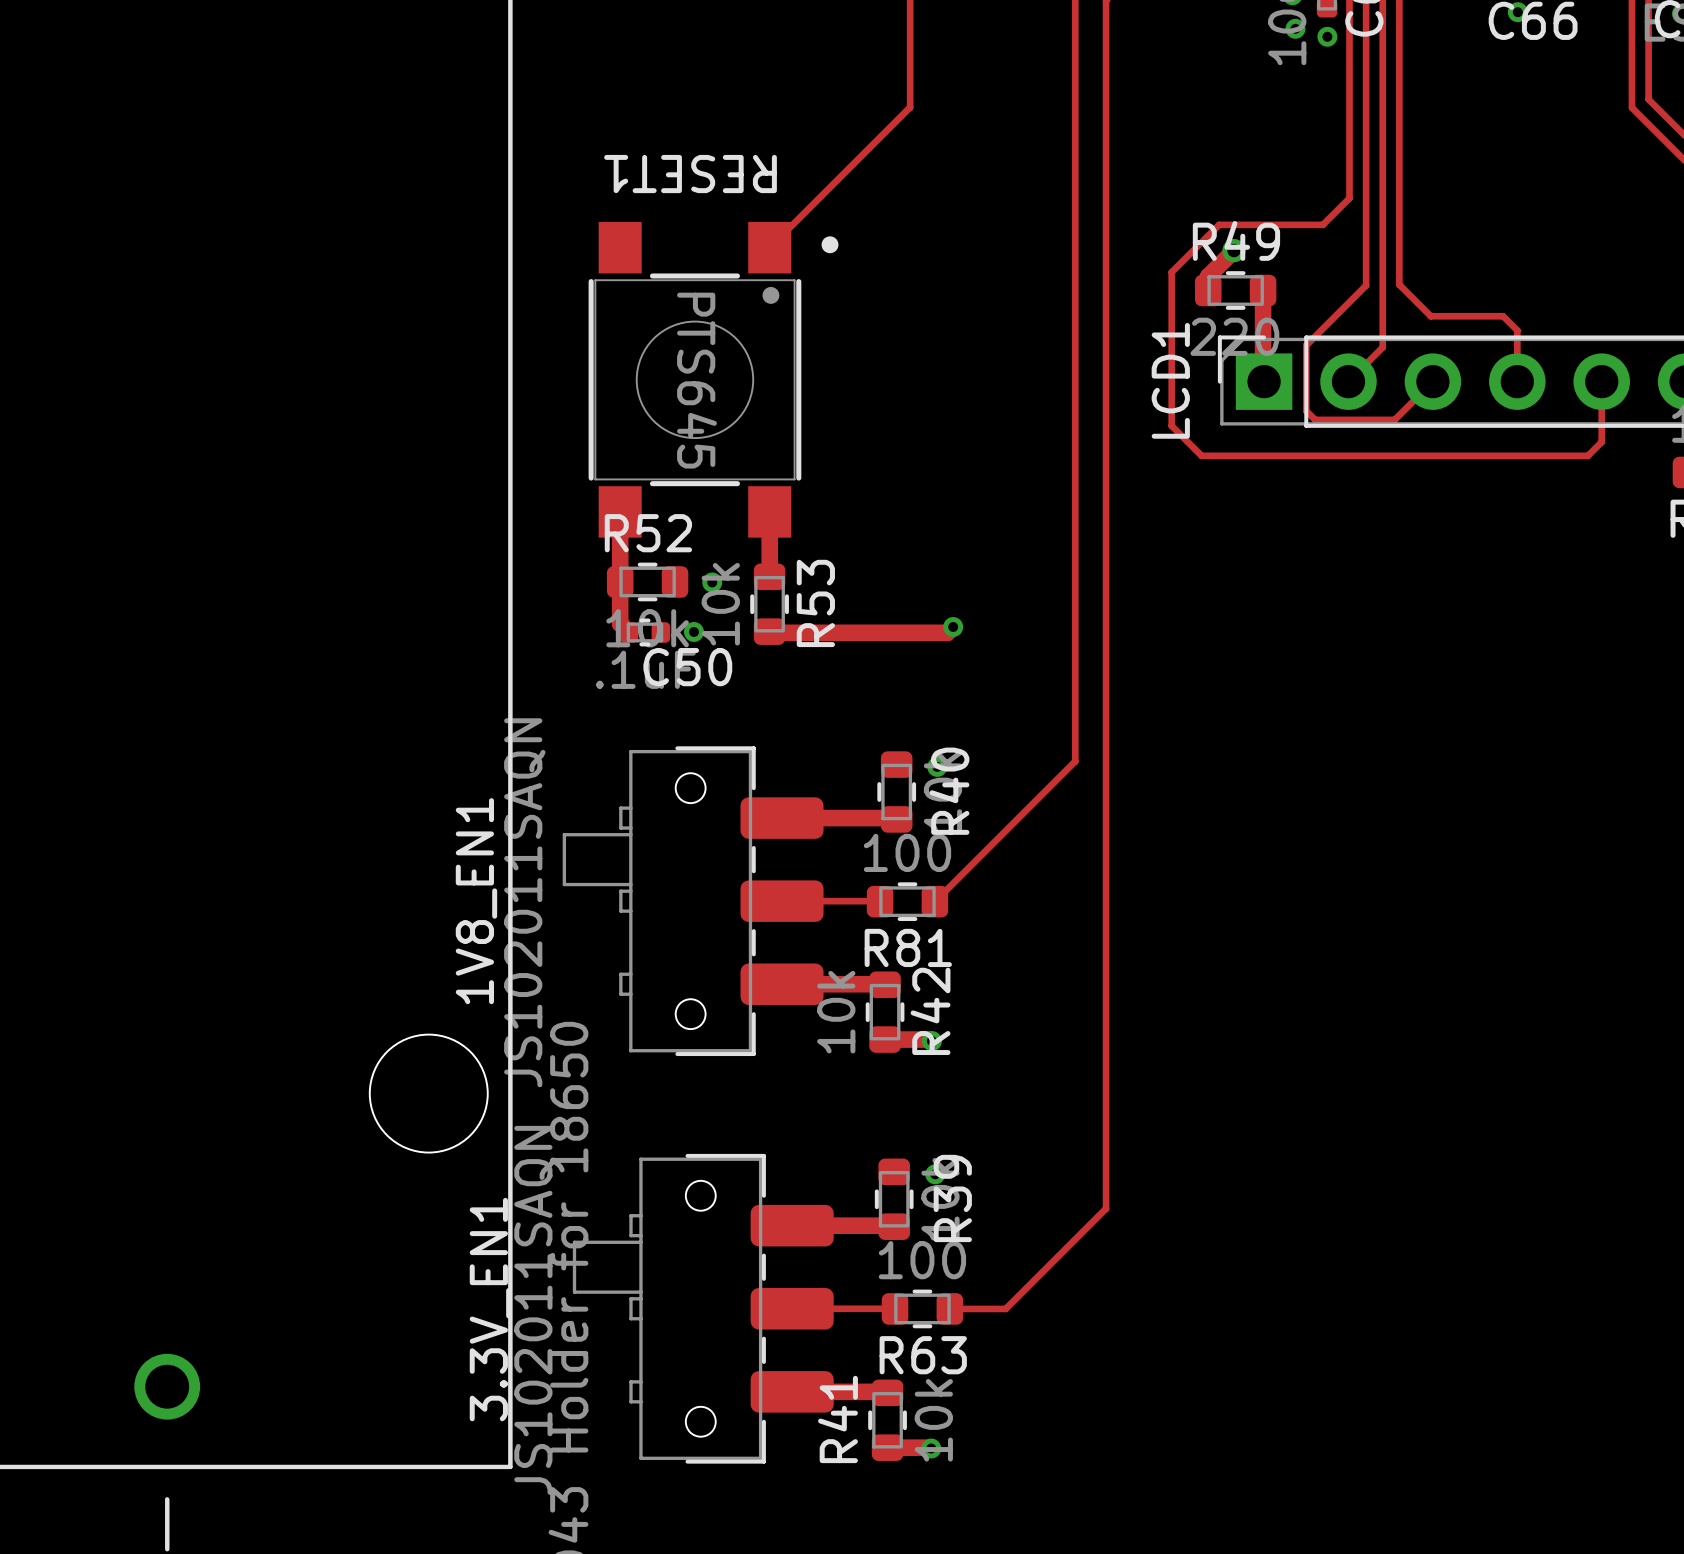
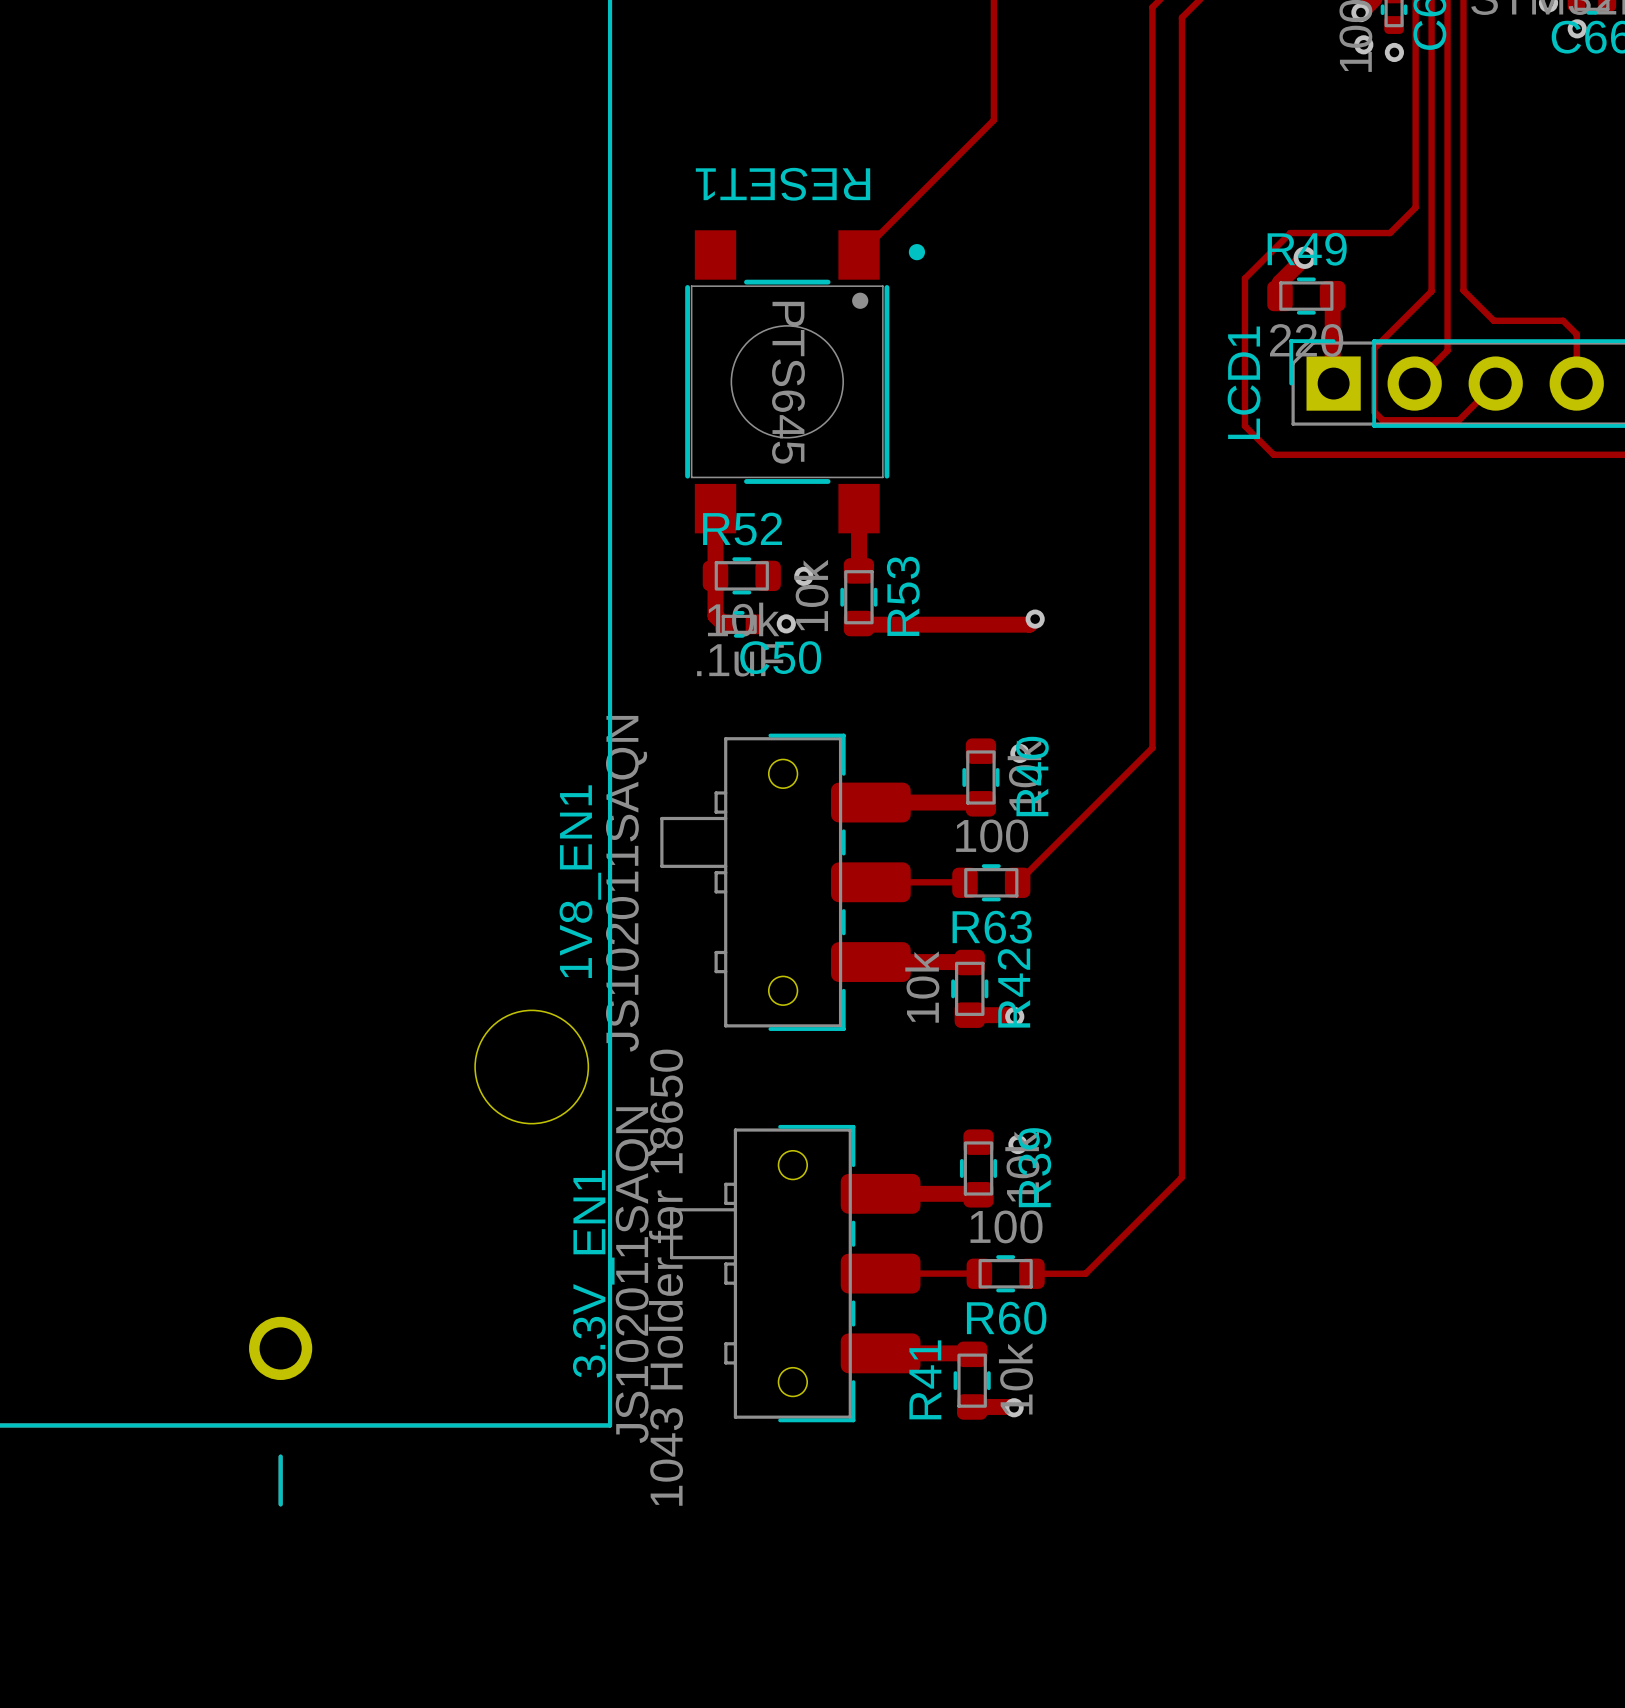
R81 name: R81 (908, 947) -> R63 (992, 927)
R63 name: R63 (923, 1355) -> R60 (1006, 1318)

